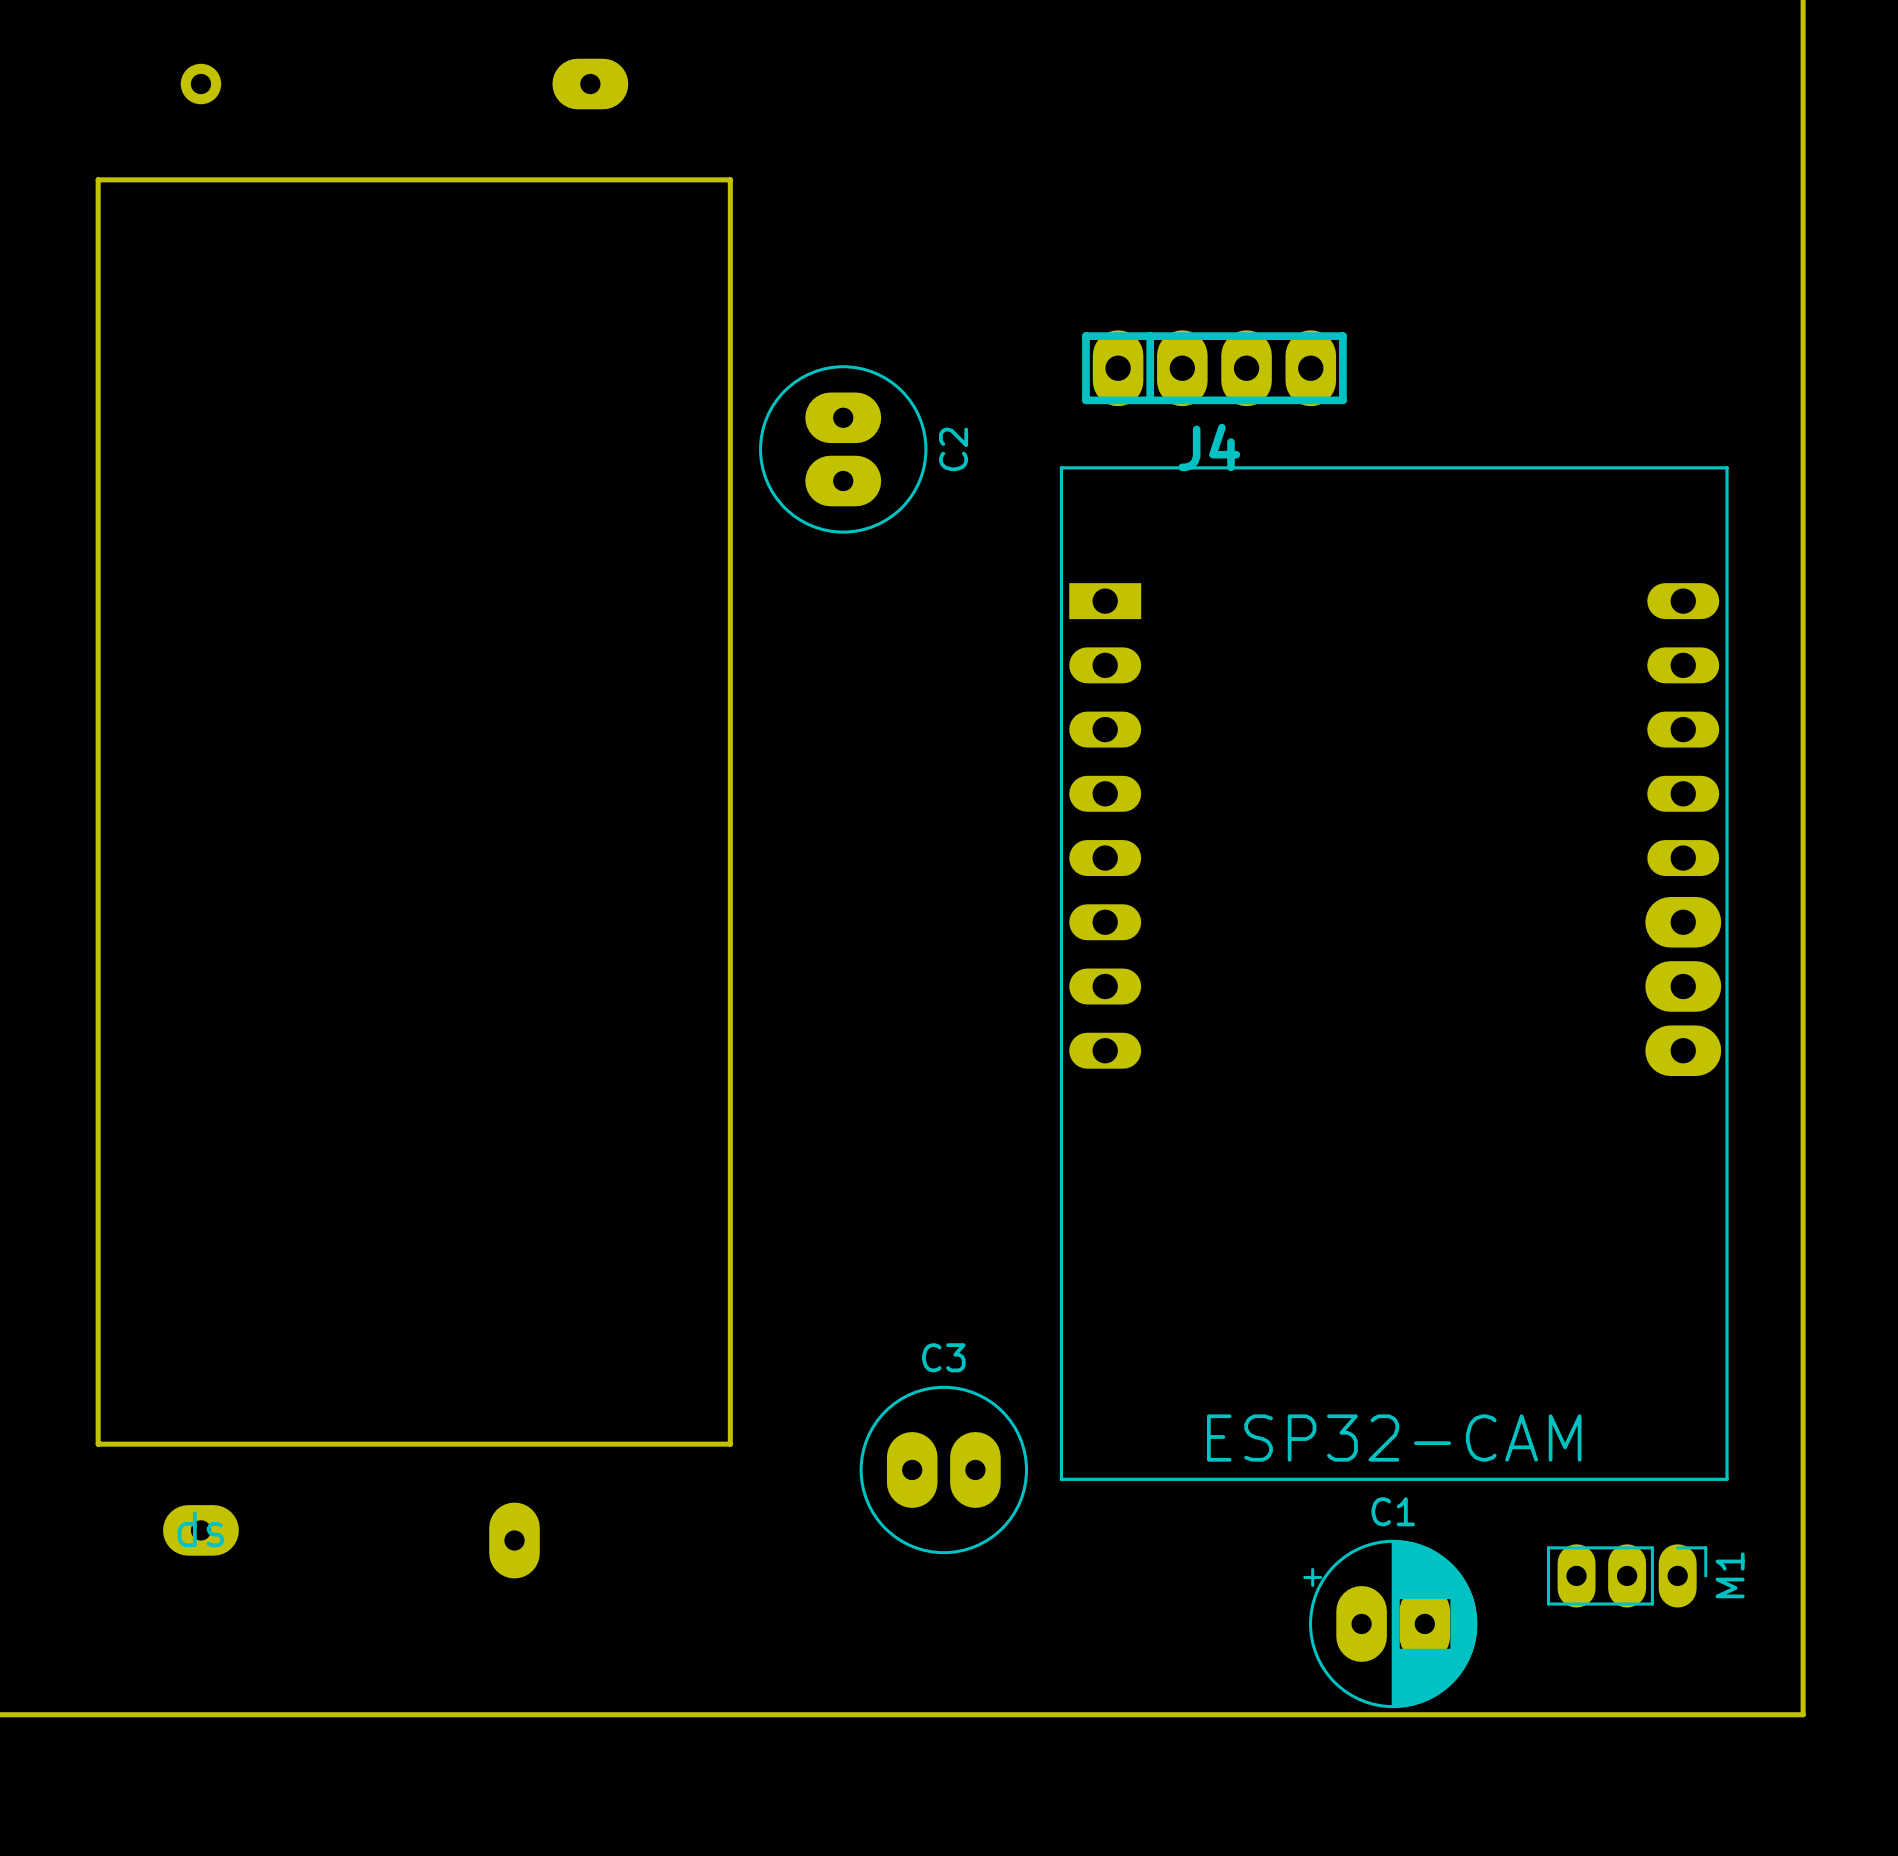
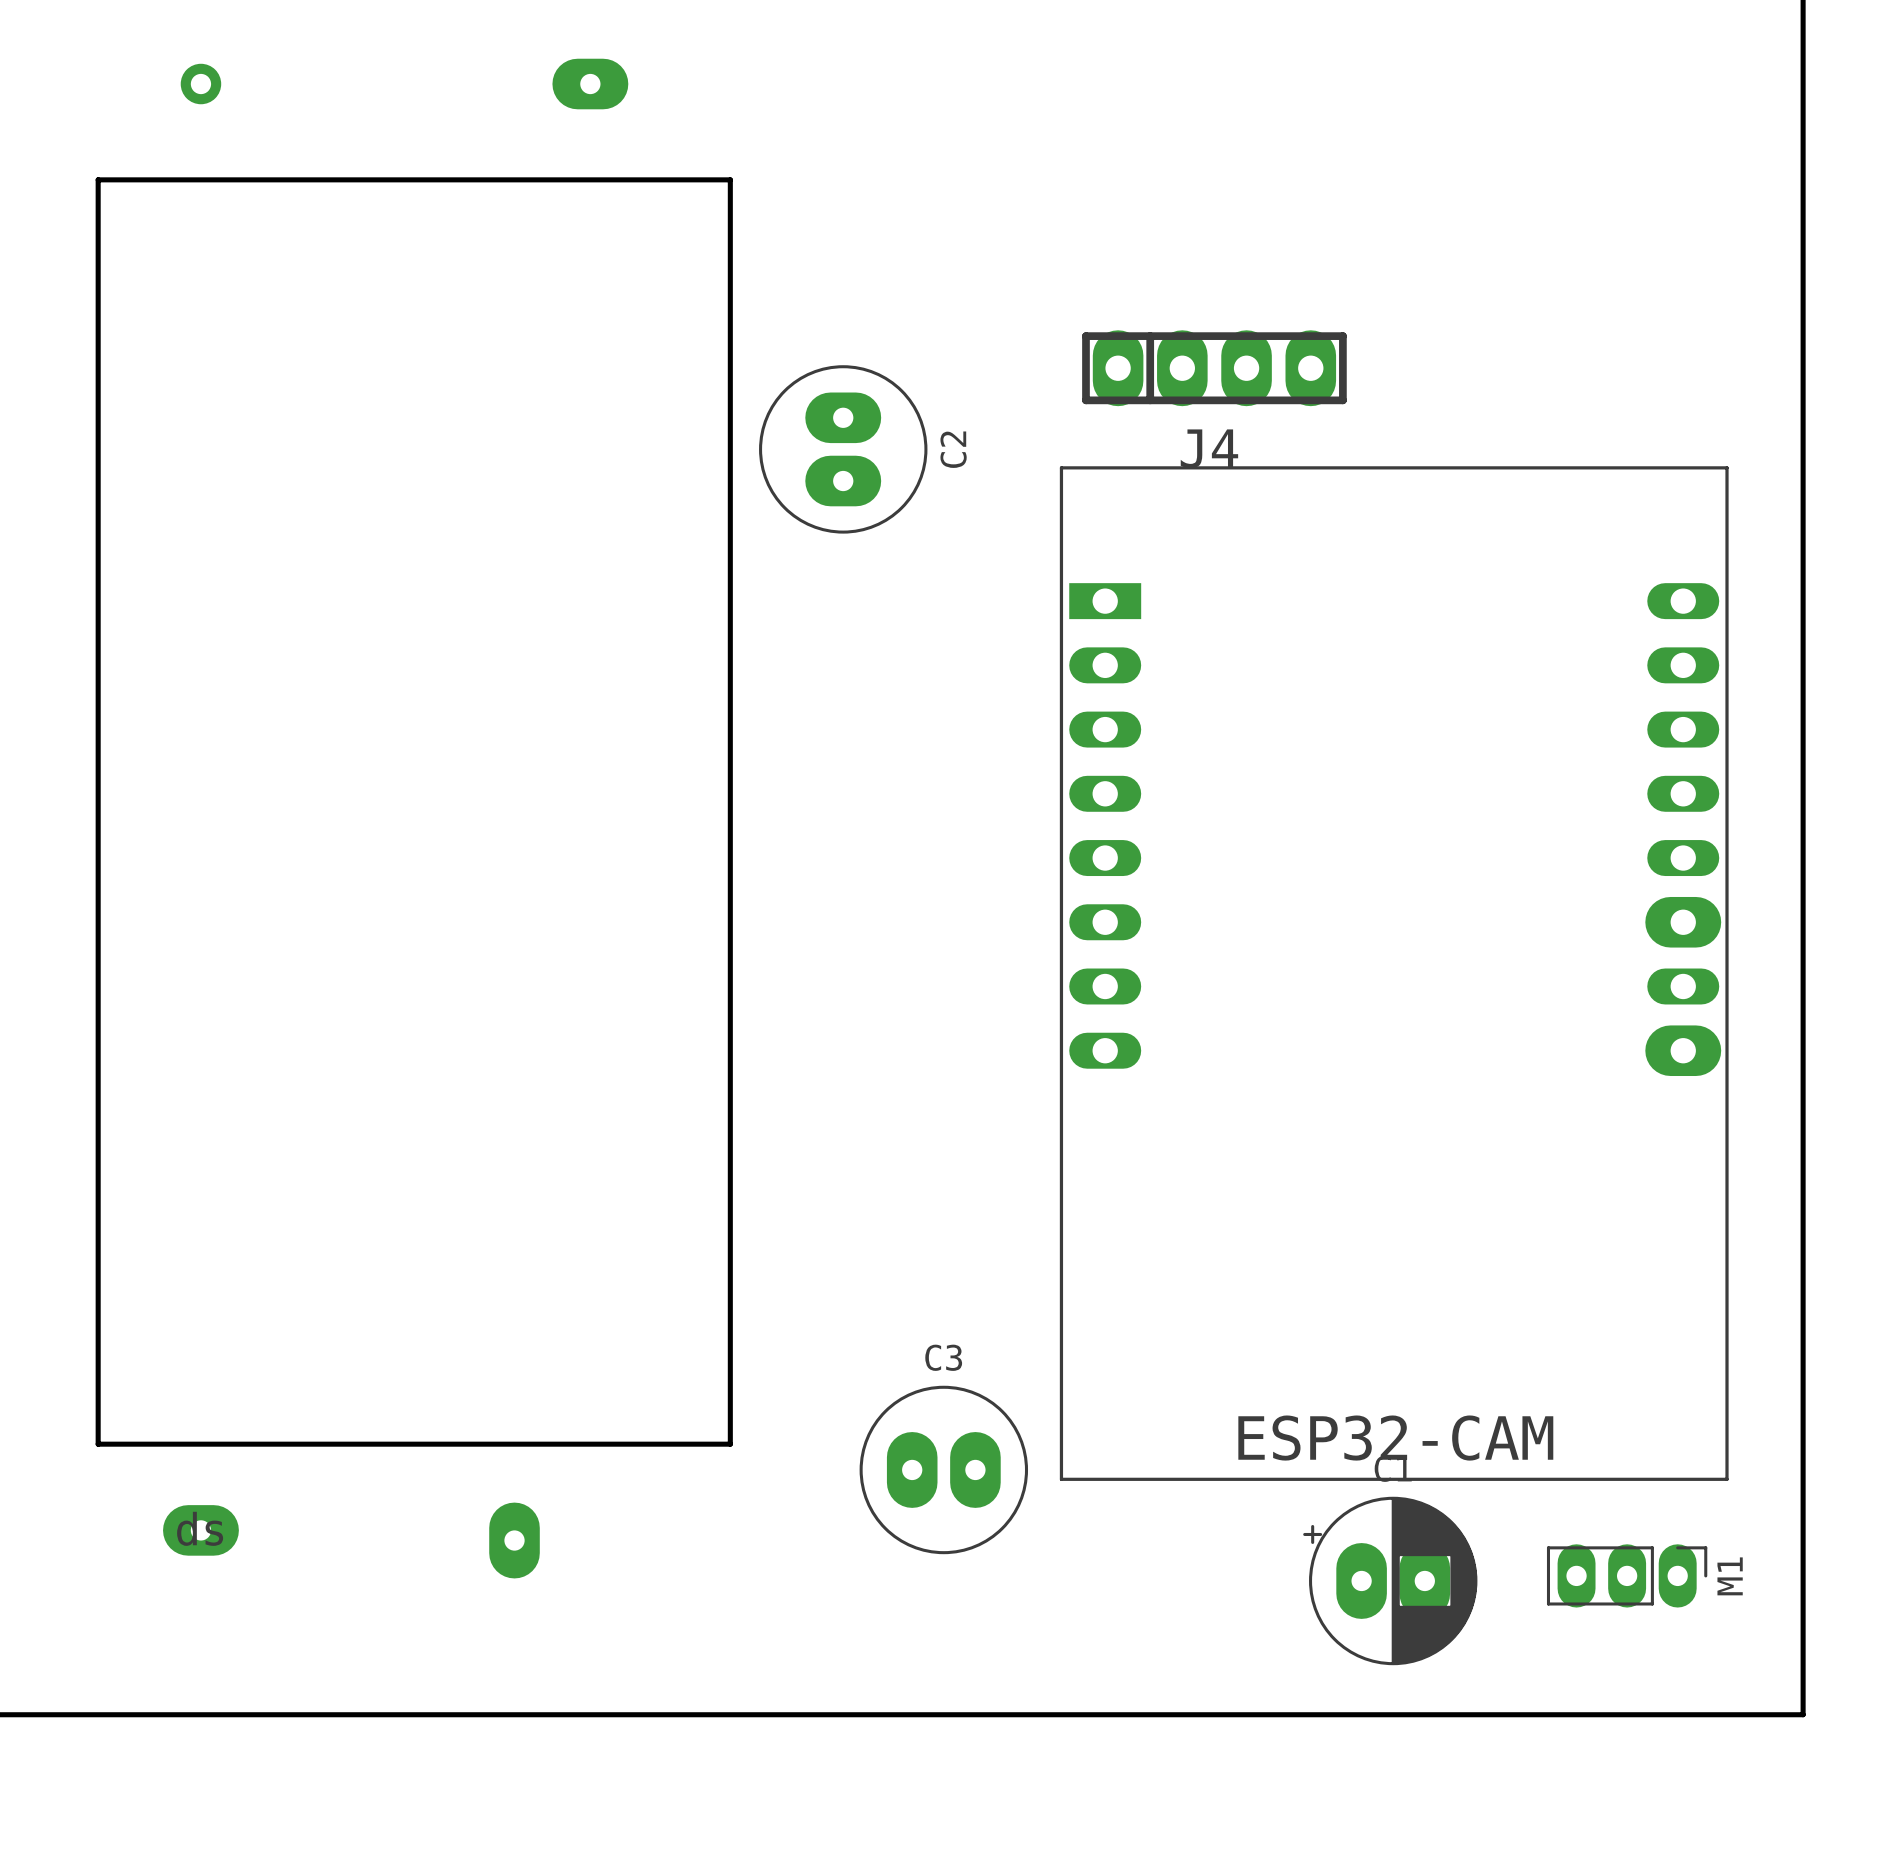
part footprint: [1059, 466, 1729, 1481] -> [1059, 466, 1729, 1481]
C1 position: (1390, 1623) -> (1390, 1580)

